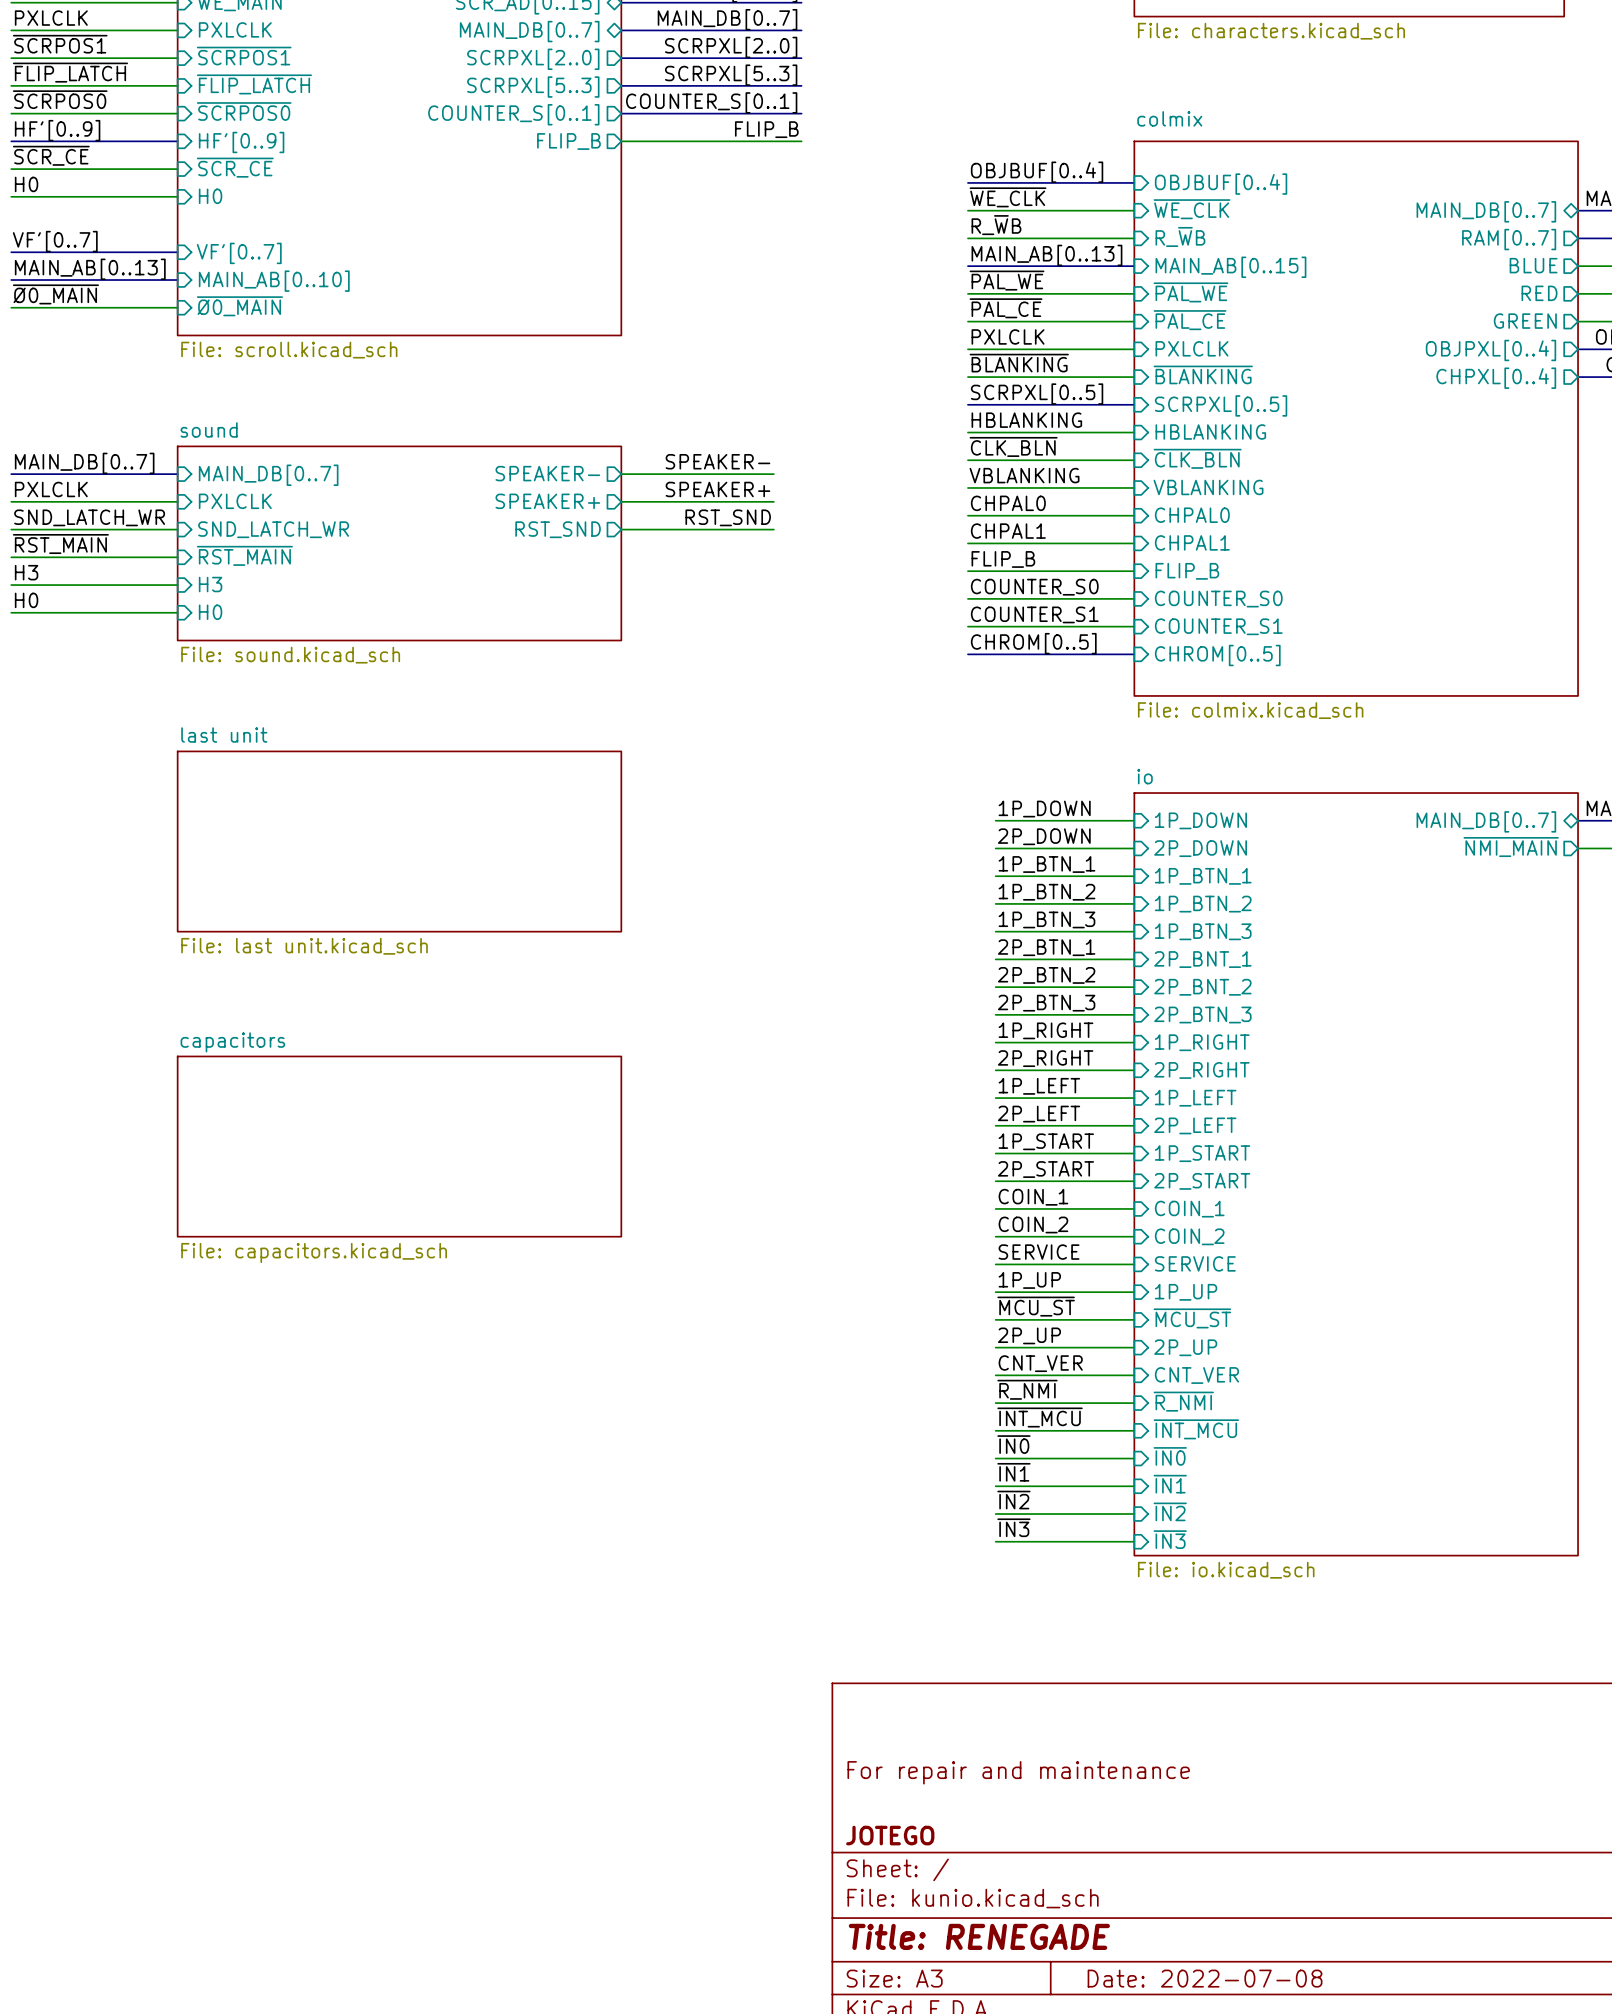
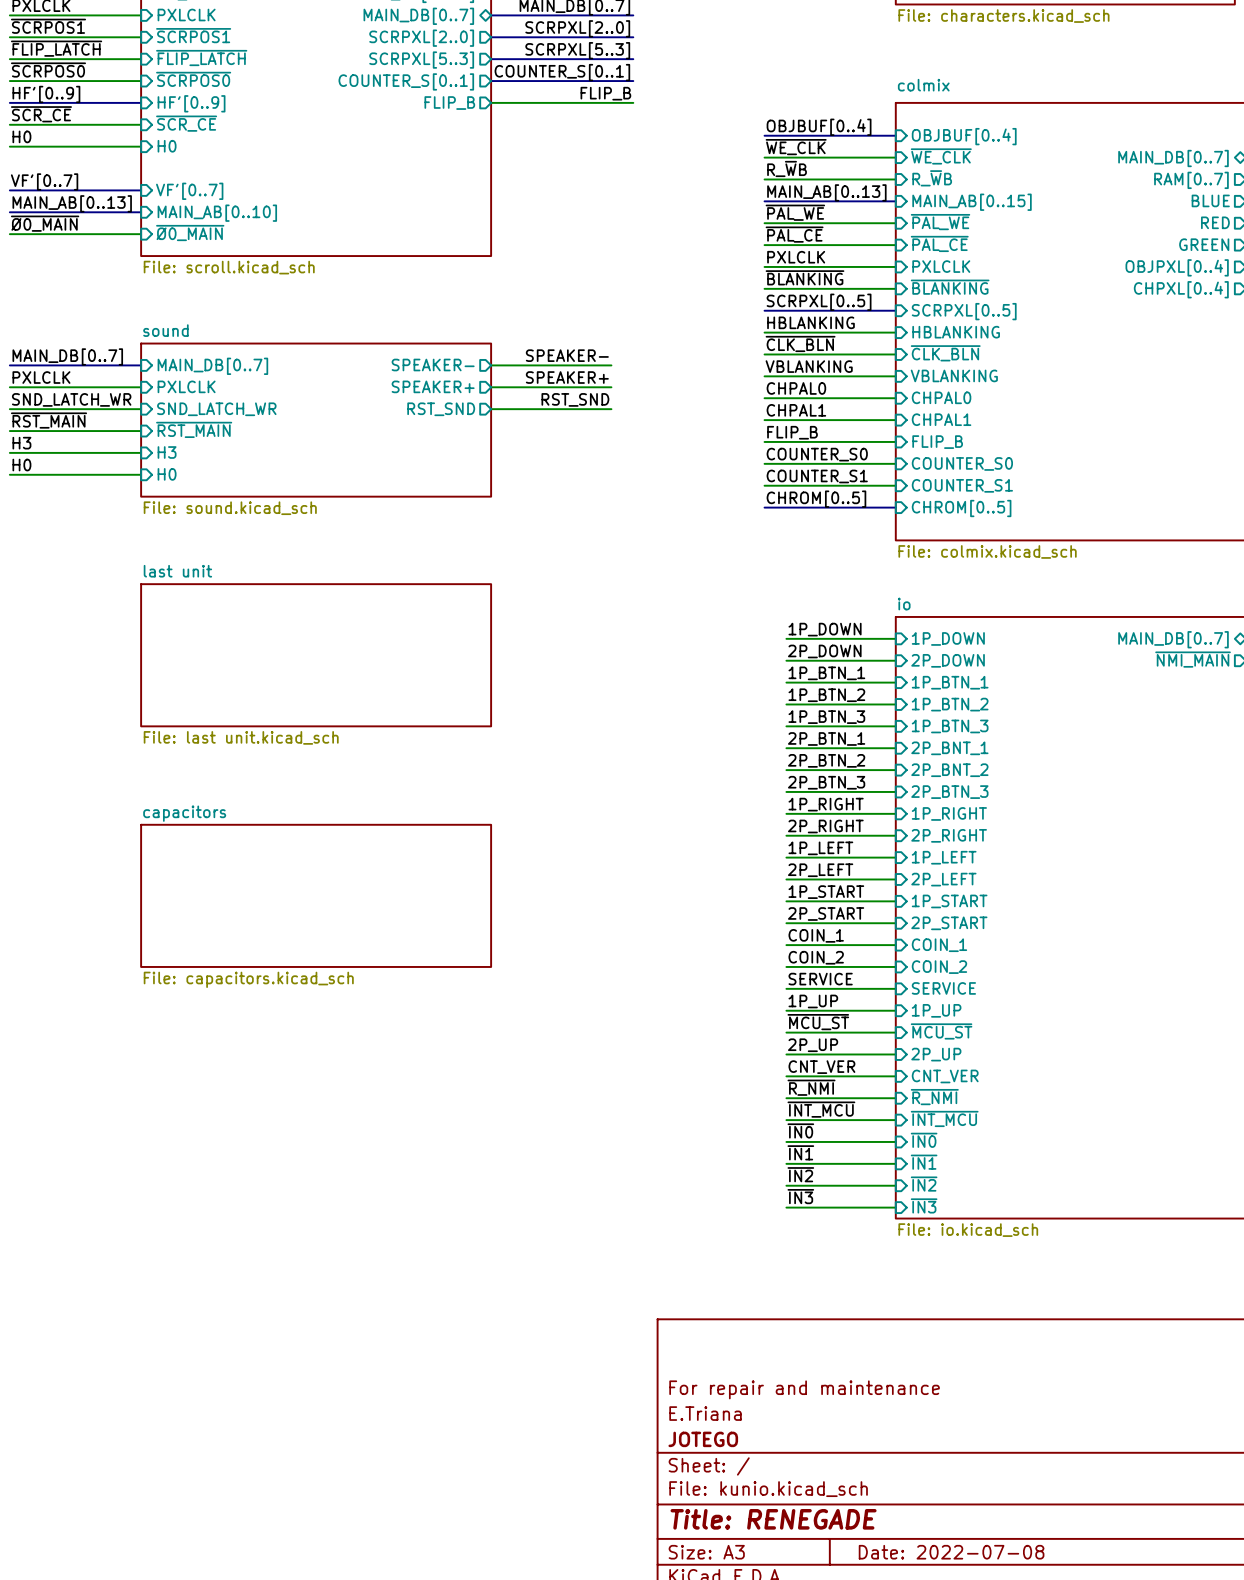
title block: none -> E.Triana (705, 1413)

